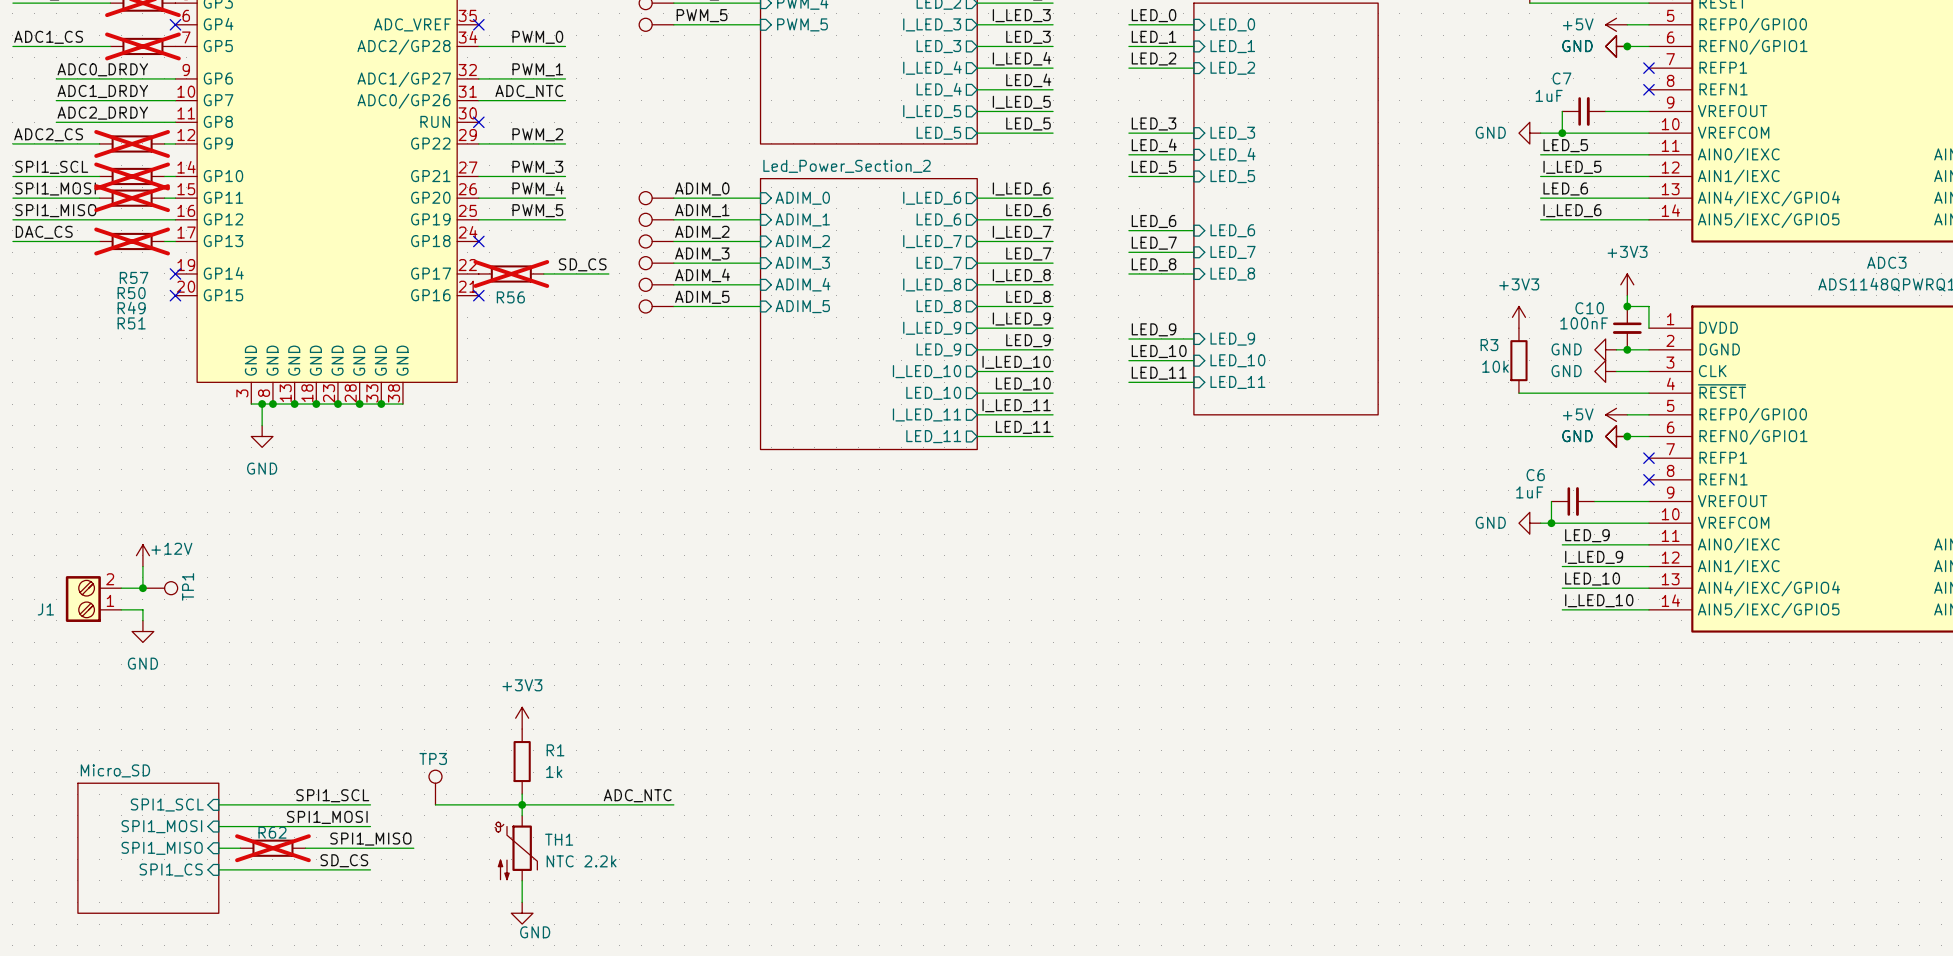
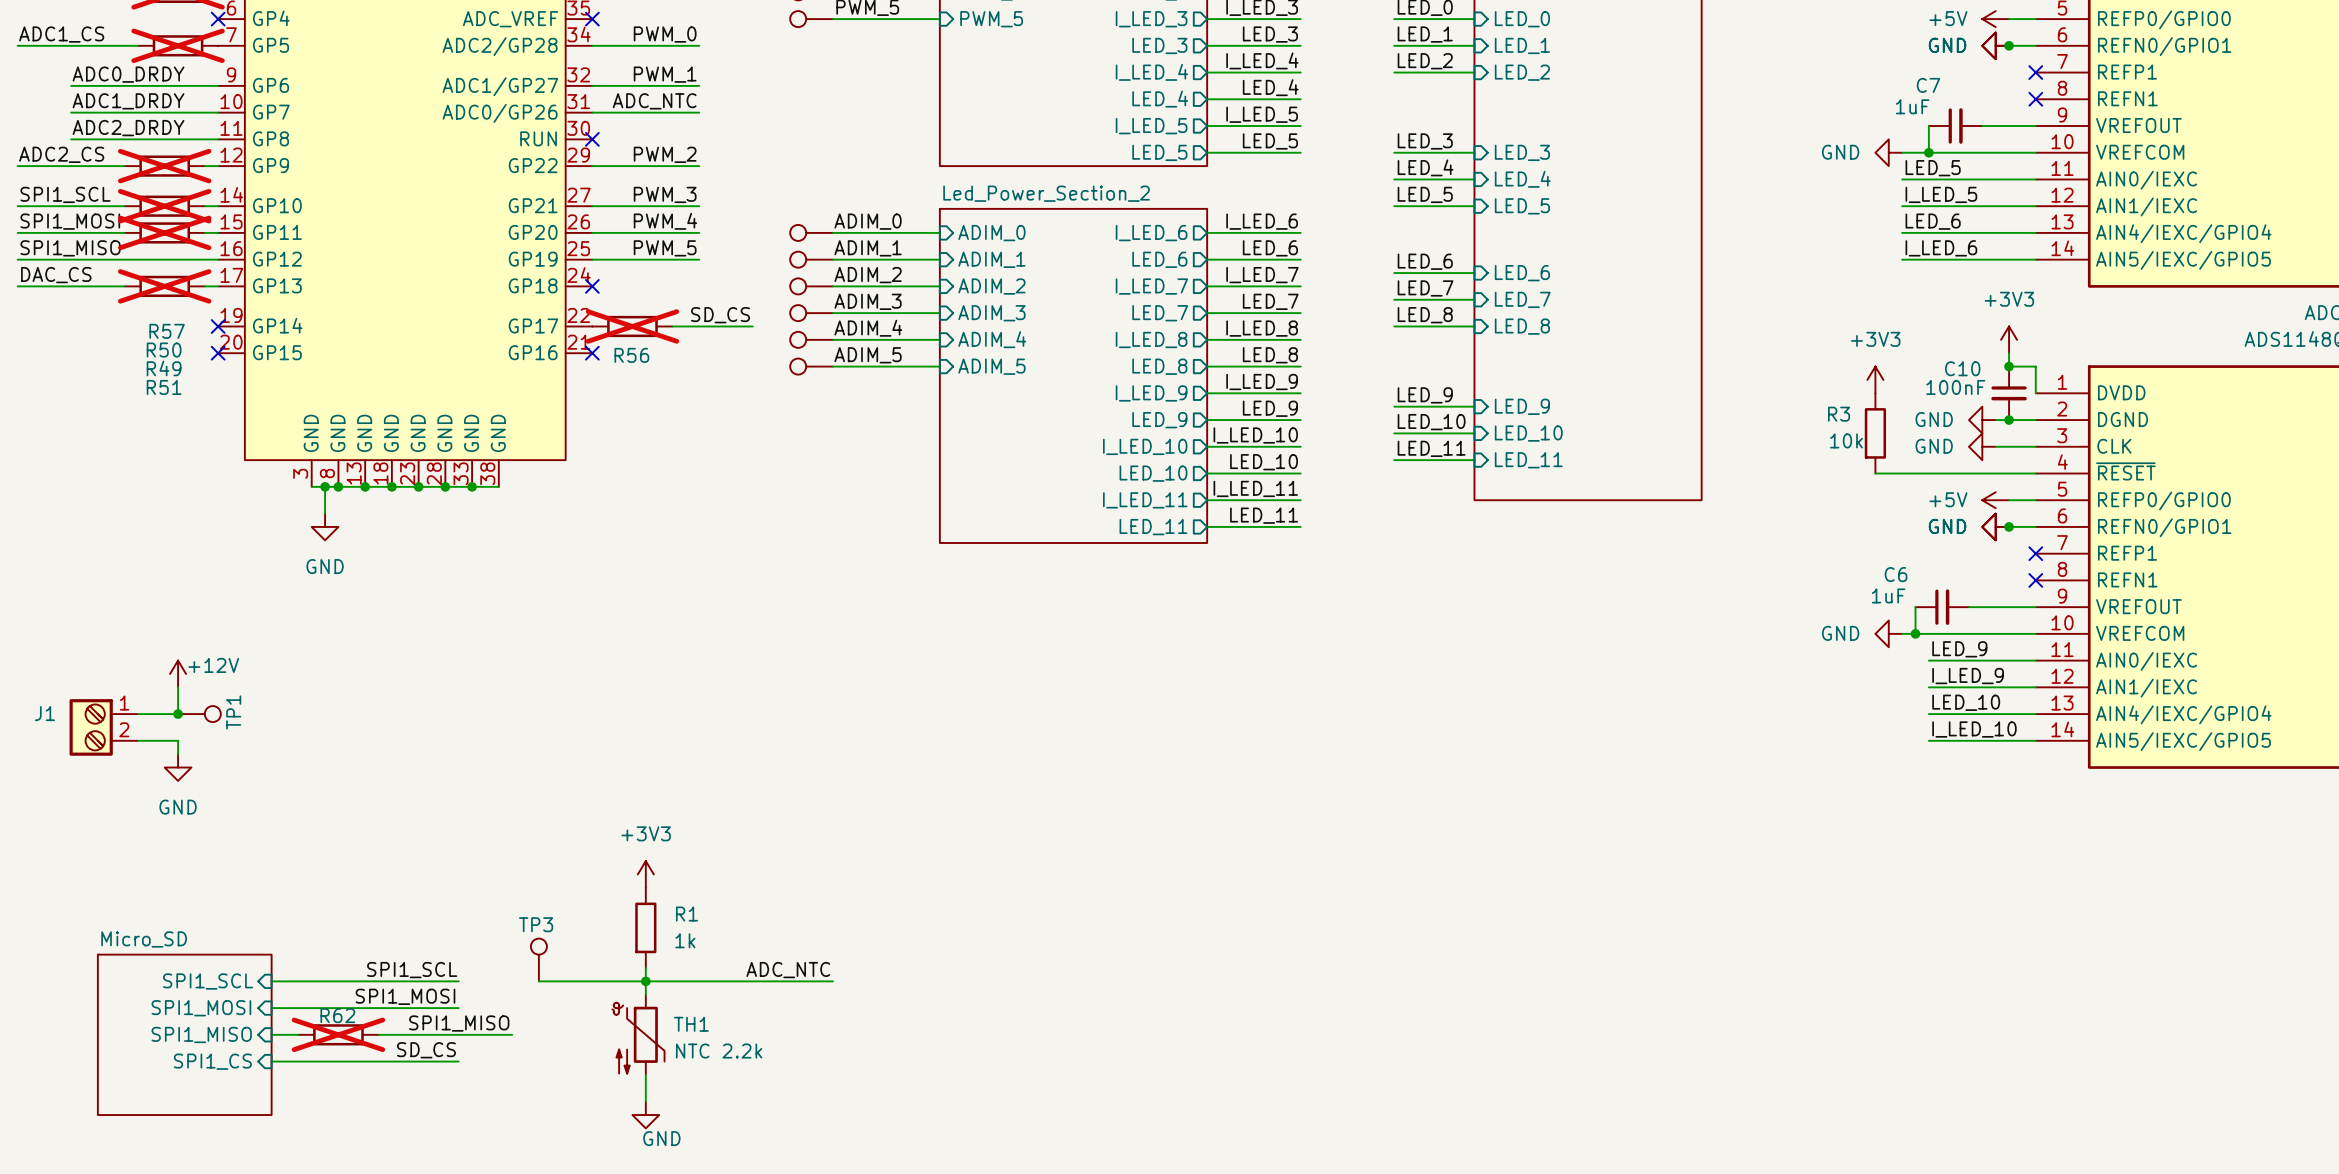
J1 flip: as is (83, 599) -> up-down (91, 727)

